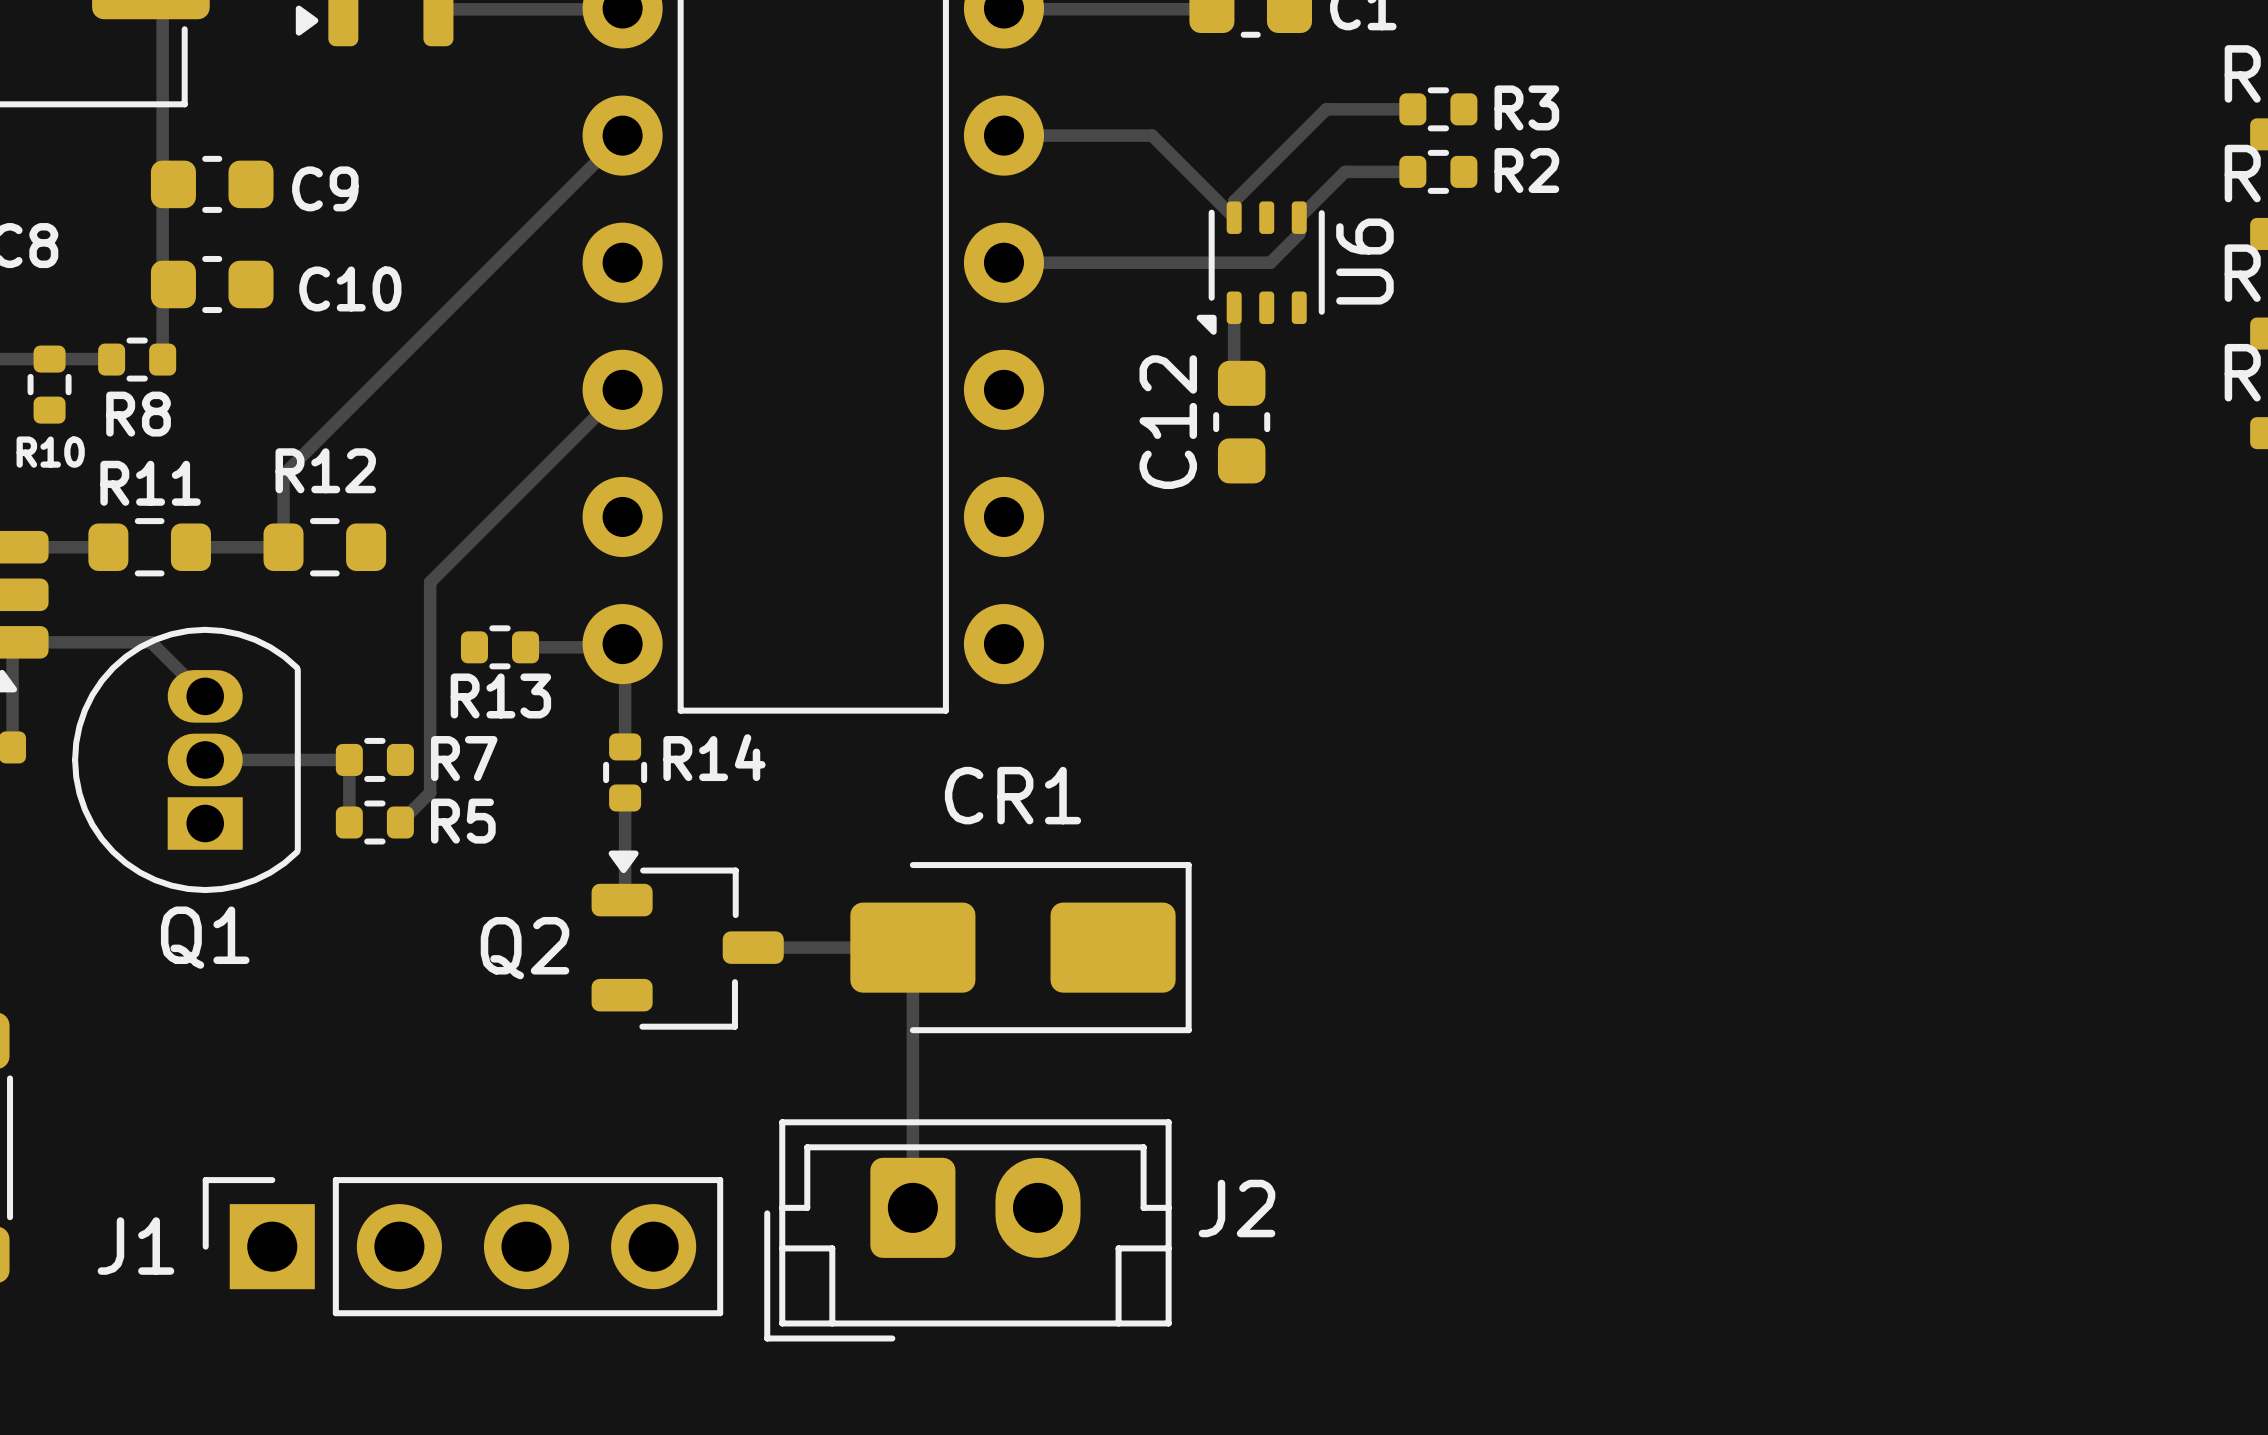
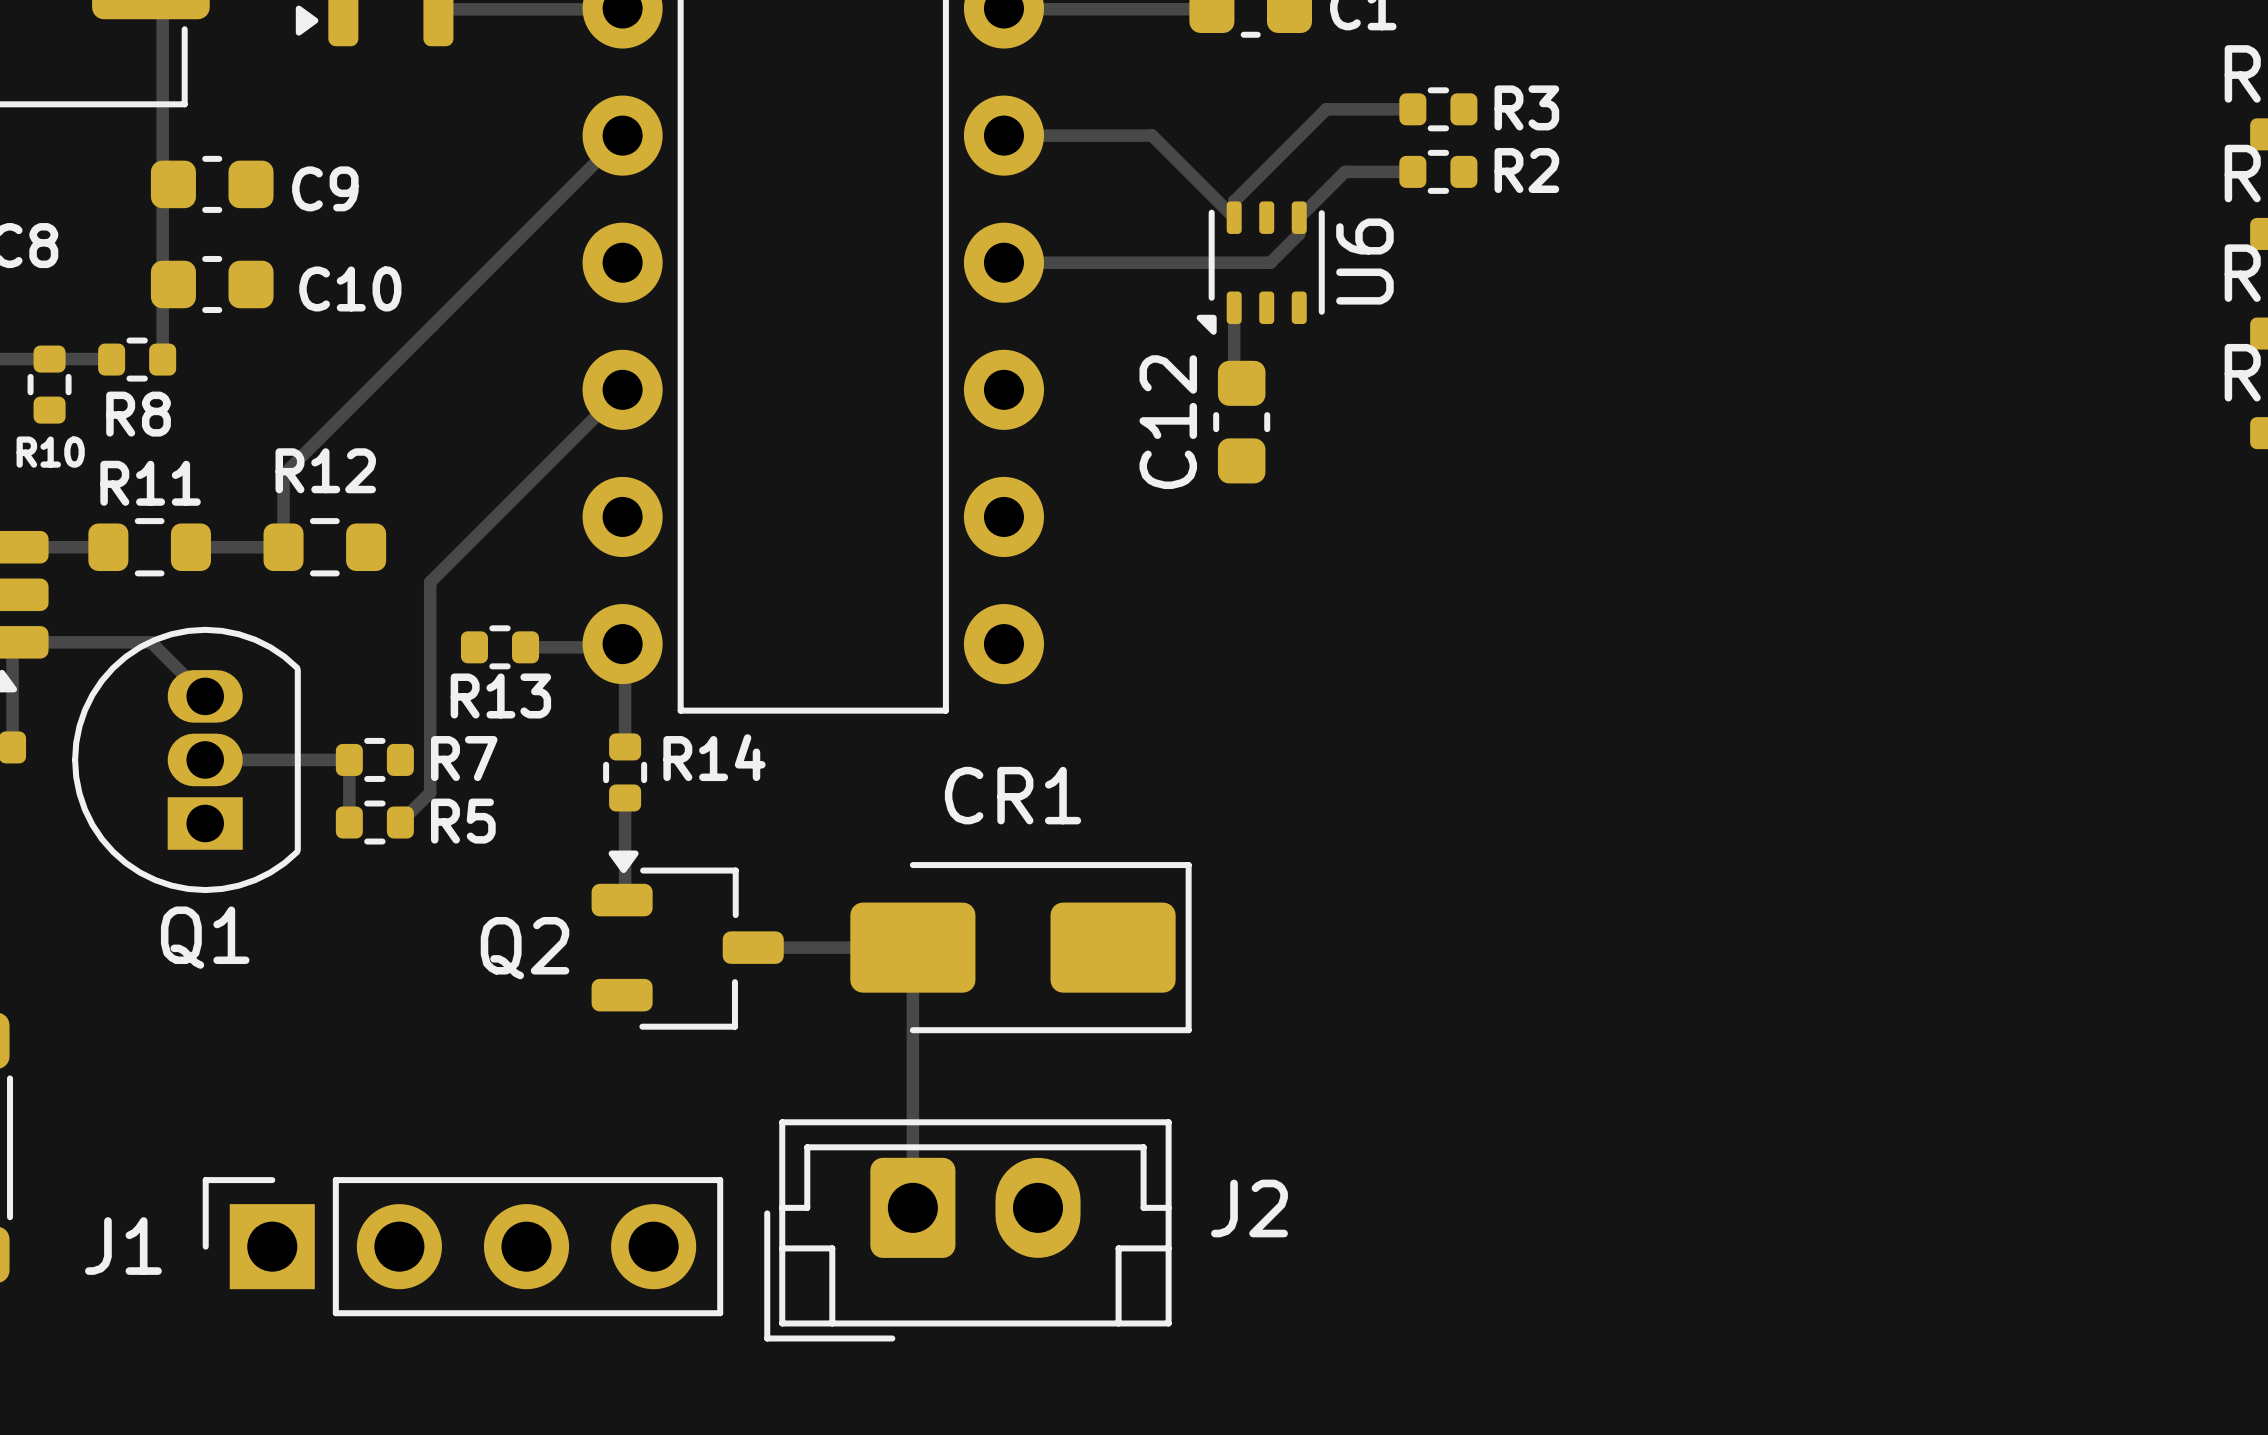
J2 name position: J2 (1237, 1208) -> J2 (1249, 1208)
J1 name position: J1 (135, 1246) -> J1 (123, 1246)

